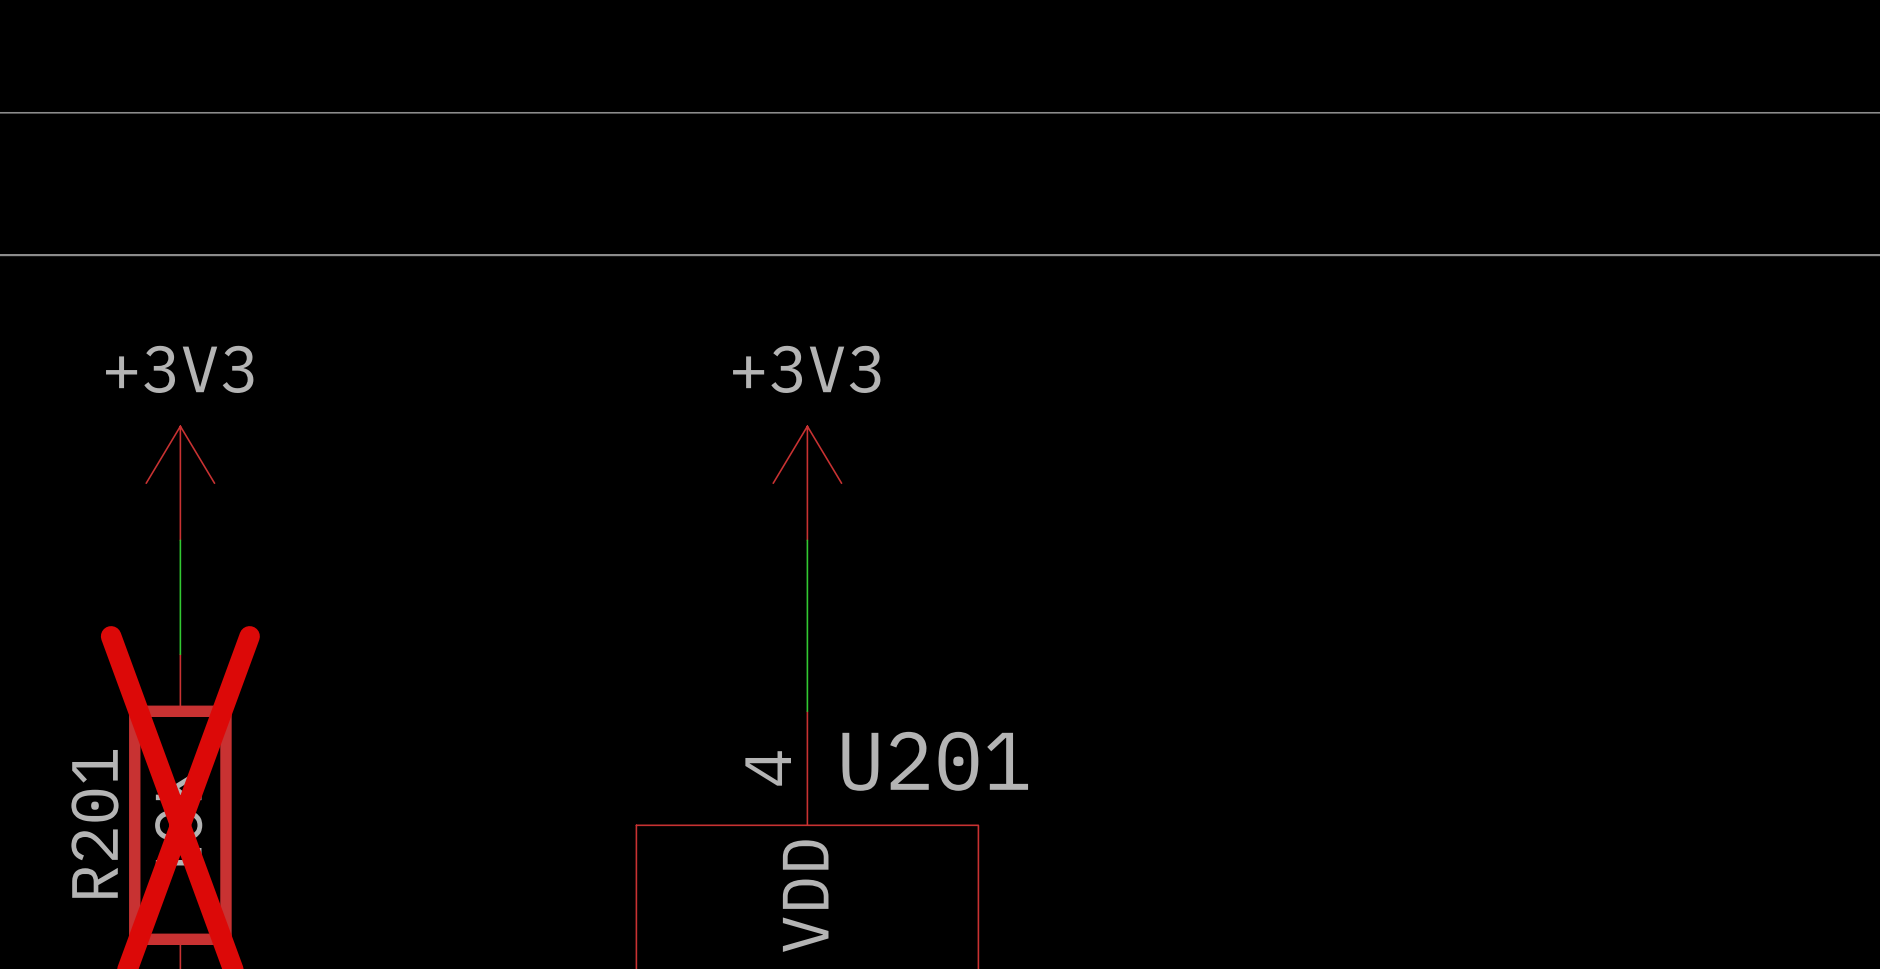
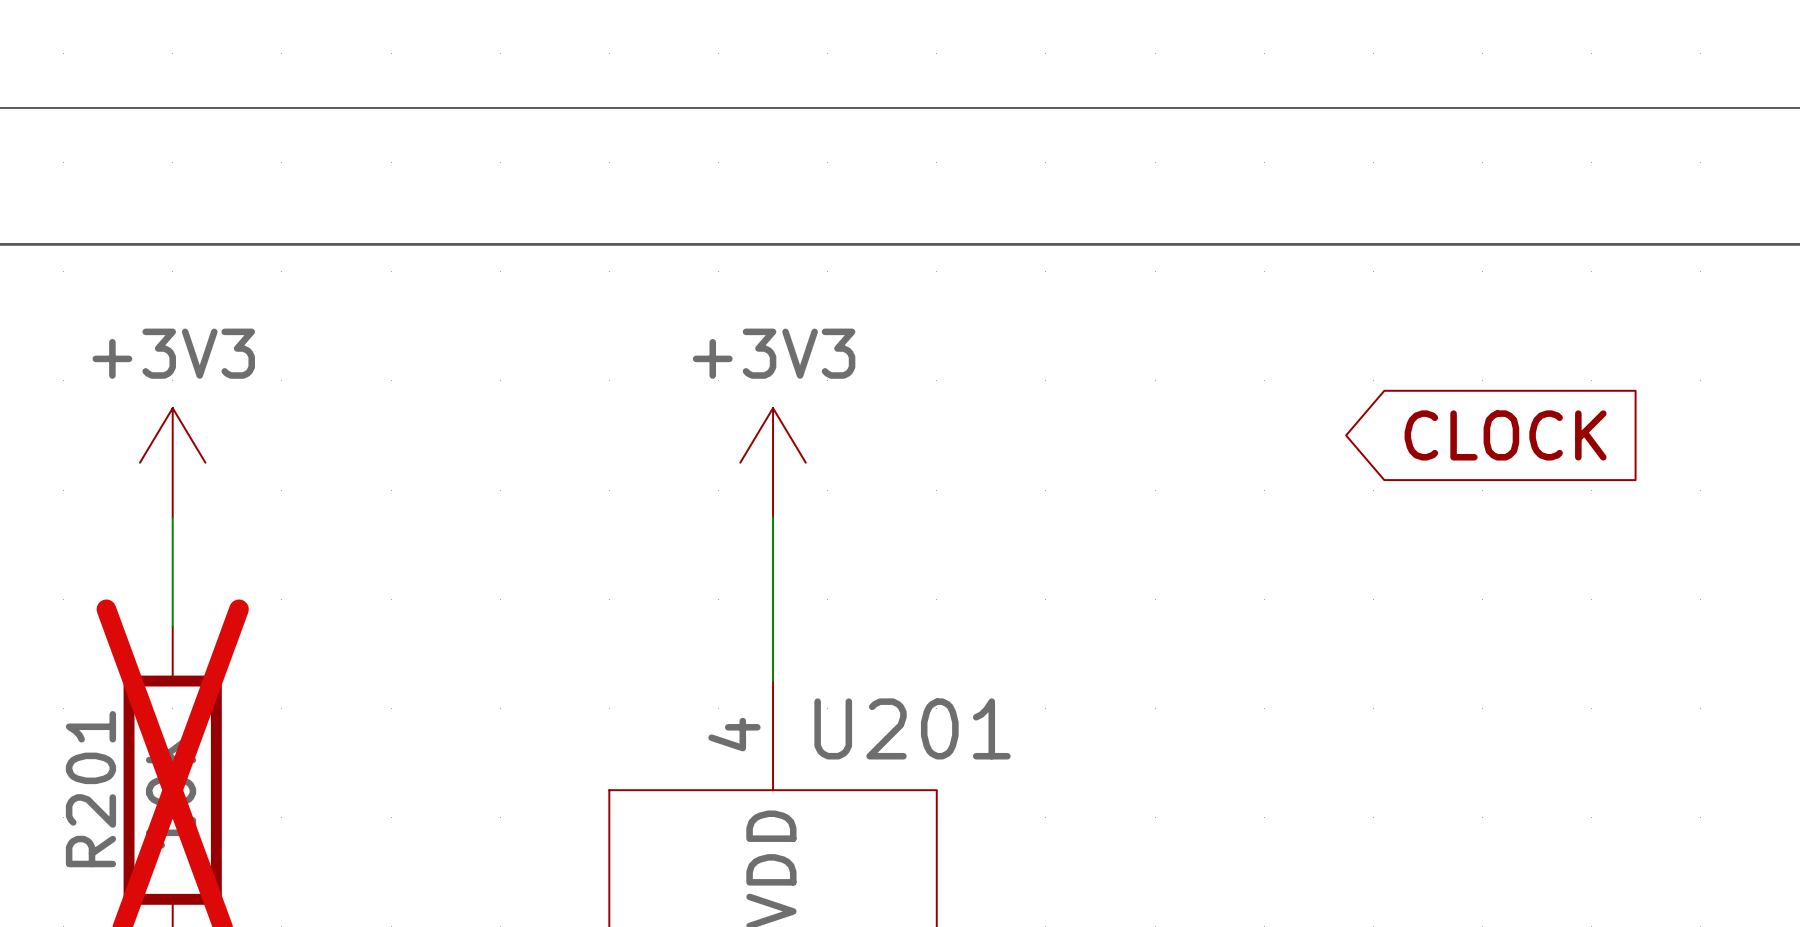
global label: none -> CLOCK (1505, 435)

